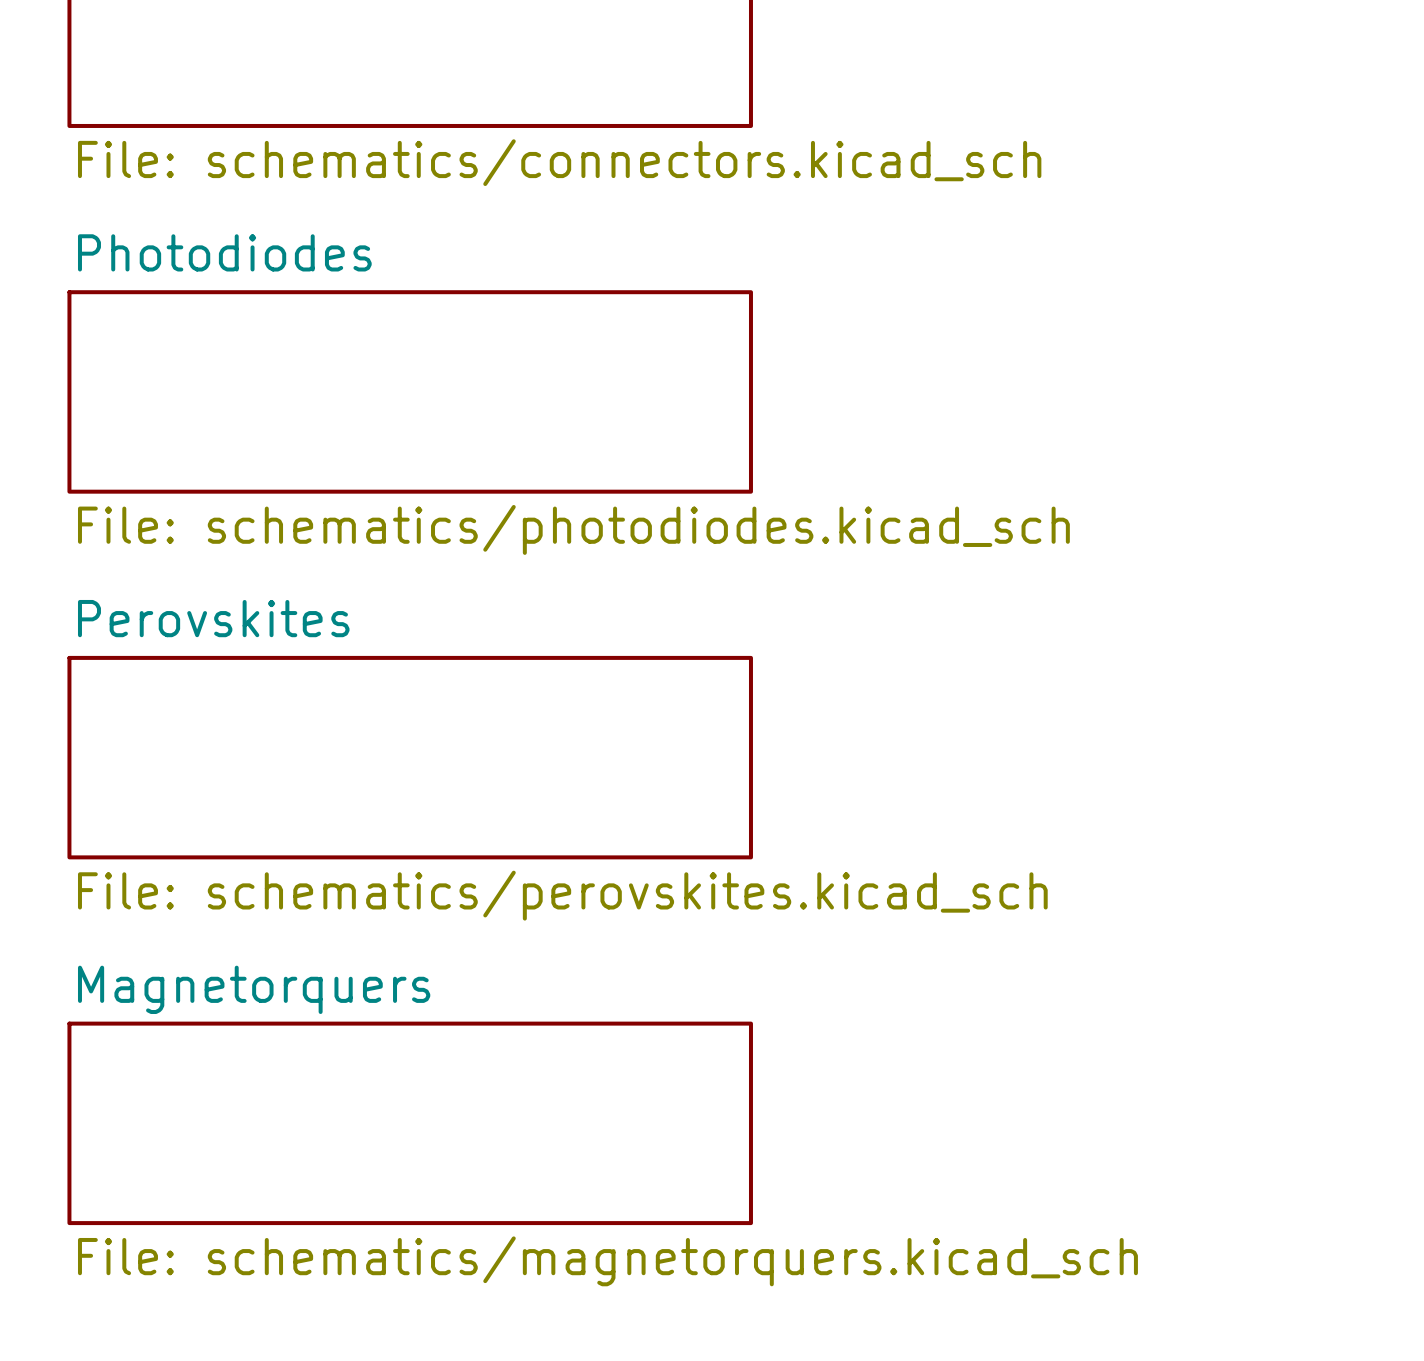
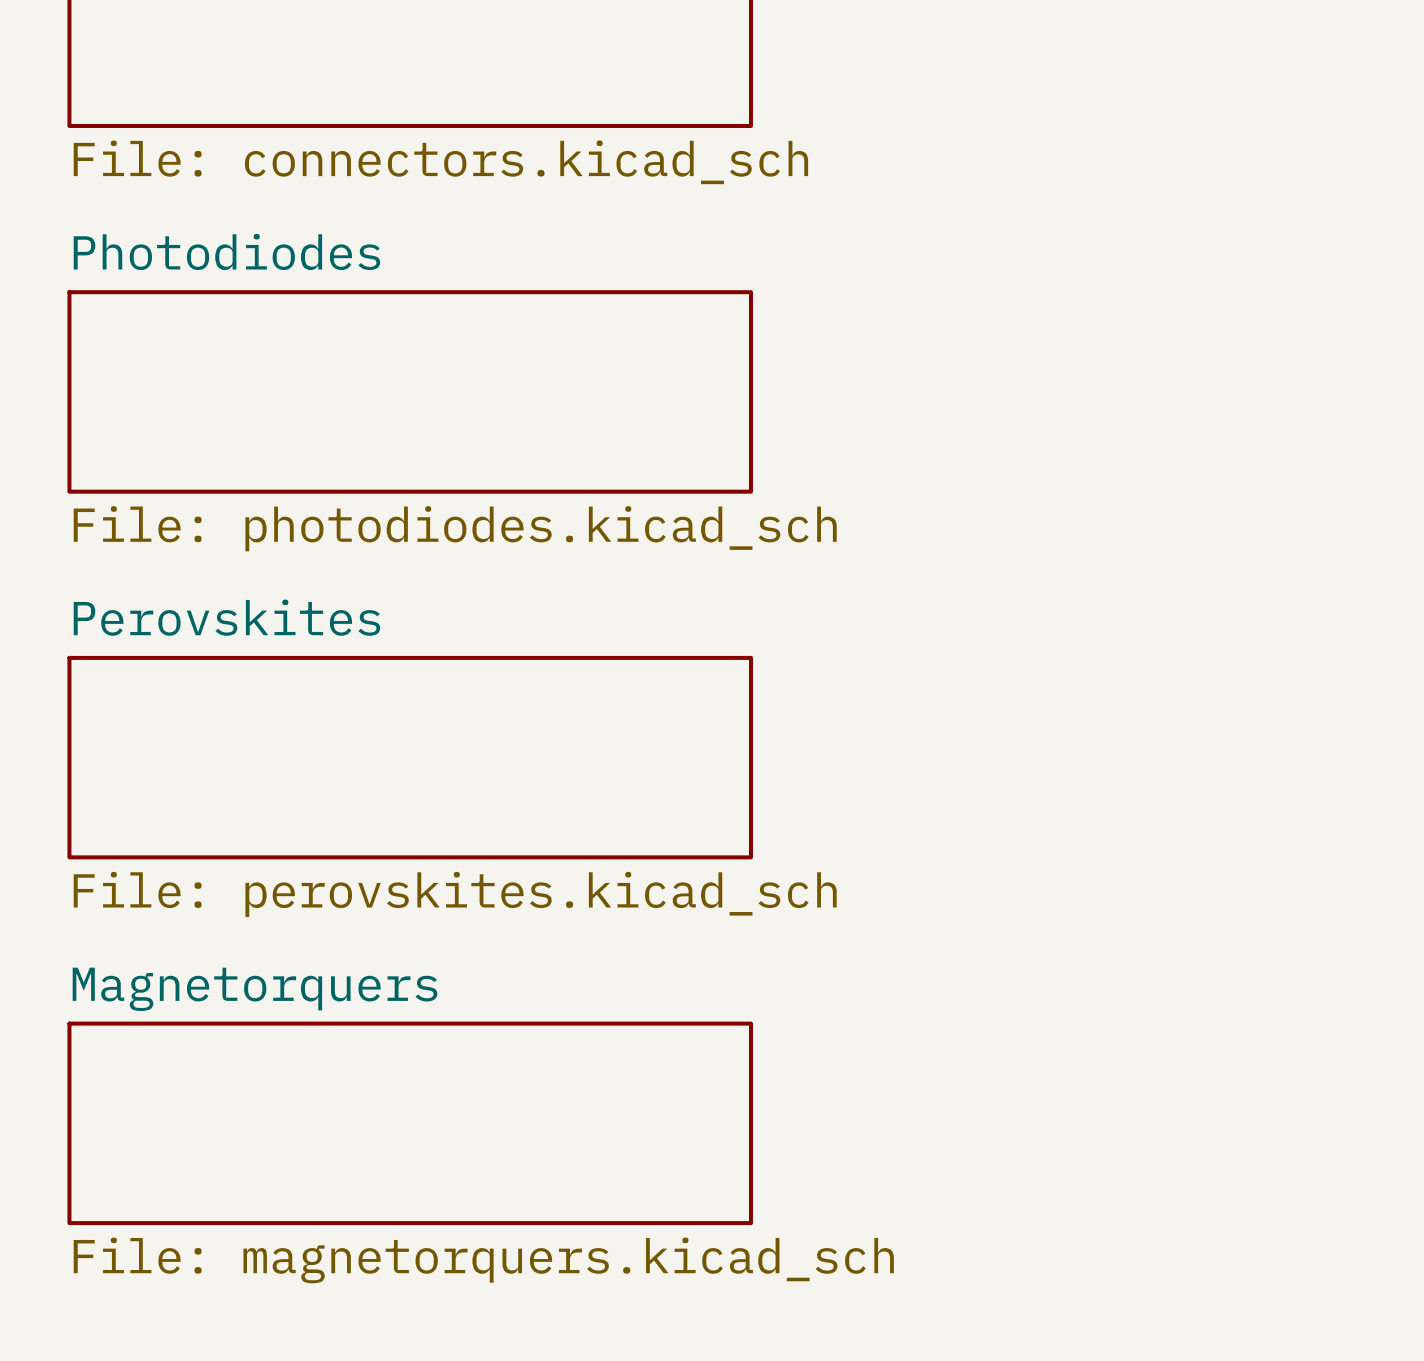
sheet value: File: schematics/connectors.kicad_sch (559, 162) -> File: connectors.kicad_sch (440, 162)
sheet Photodiodes value: File: schematics/photodiodes.kicad_sch (573, 529) -> File: photodiodes.kicad_sch (455, 528)
sheet Perovskites value: File: schematics/perovskites.kicad_sch (562, 895) -> File: perovskites.kicad_sch (455, 894)
sheet Magnetorquers value: File: schematics/magnetorquers.kicad_sch (607, 1261) -> File: magnetorquers.kicad_sch (483, 1260)

